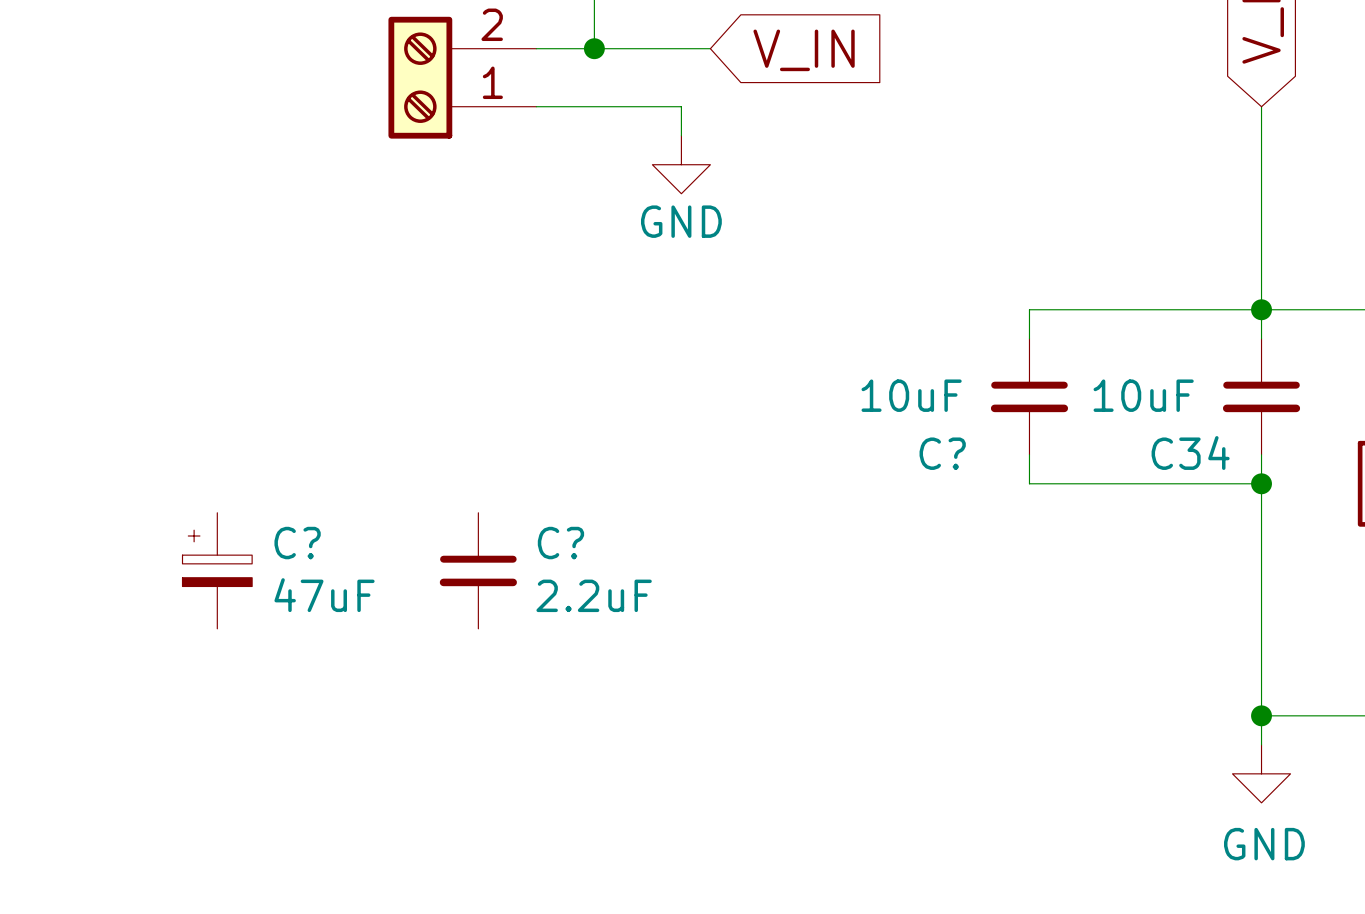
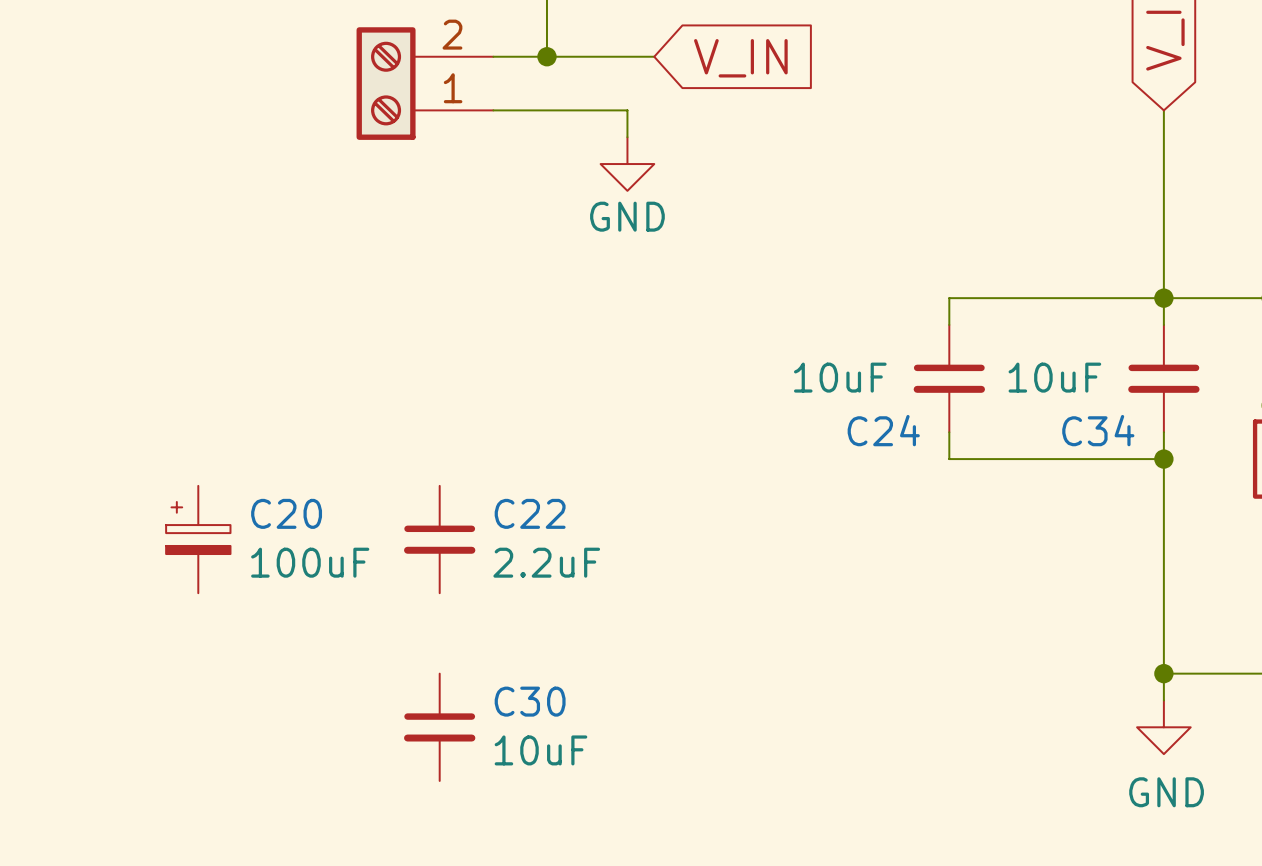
C? name: C? (942, 453) -> C24 (883, 430)
C? name: C? (297, 543) -> C20 (286, 513)
C? name: C? (560, 543) -> C22 (530, 513)
C? value: 47uF (324, 595) -> 100uF (310, 562)
C30: none -> 10uF (439, 727)

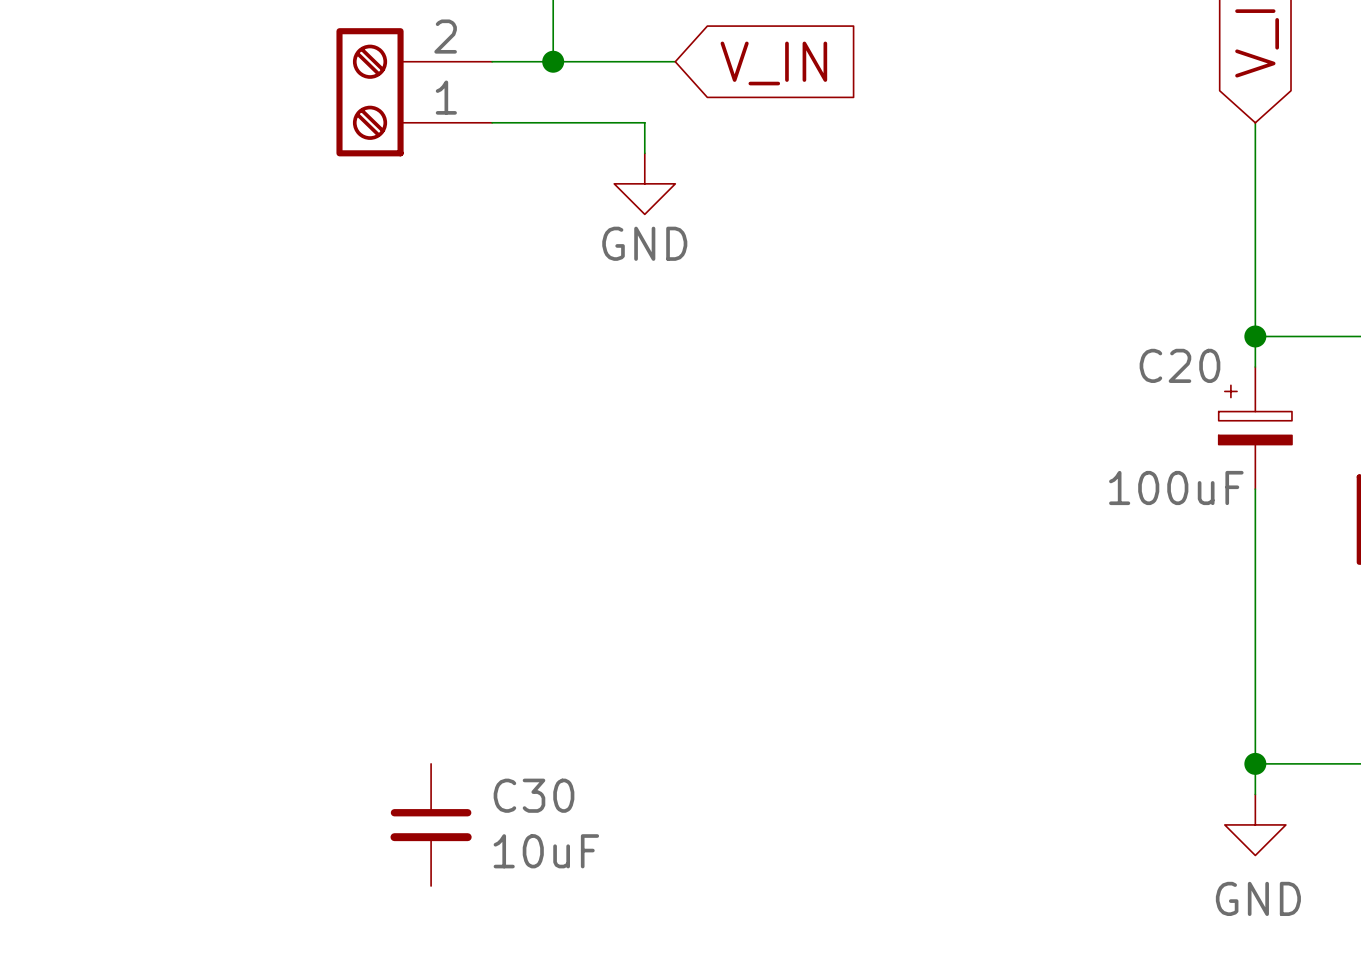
wire: (1163, 298) (949, 298) (949, 324) -> none
C24: 10uF (949, 378) -> none
C34: 10uF (1163, 378) -> none
wire: (949, 432) (949, 459) (1163, 459) -> none
junction: (1163, 459) -> none
C20 name position: C20 (286, 513) -> C20 (1179, 365)
C20 position: (198, 539) -> (1255, 428)
C22: 2.2uF (439, 539) -> none
C20 value position: 100uF (310, 562) -> 100uF (1176, 487)

